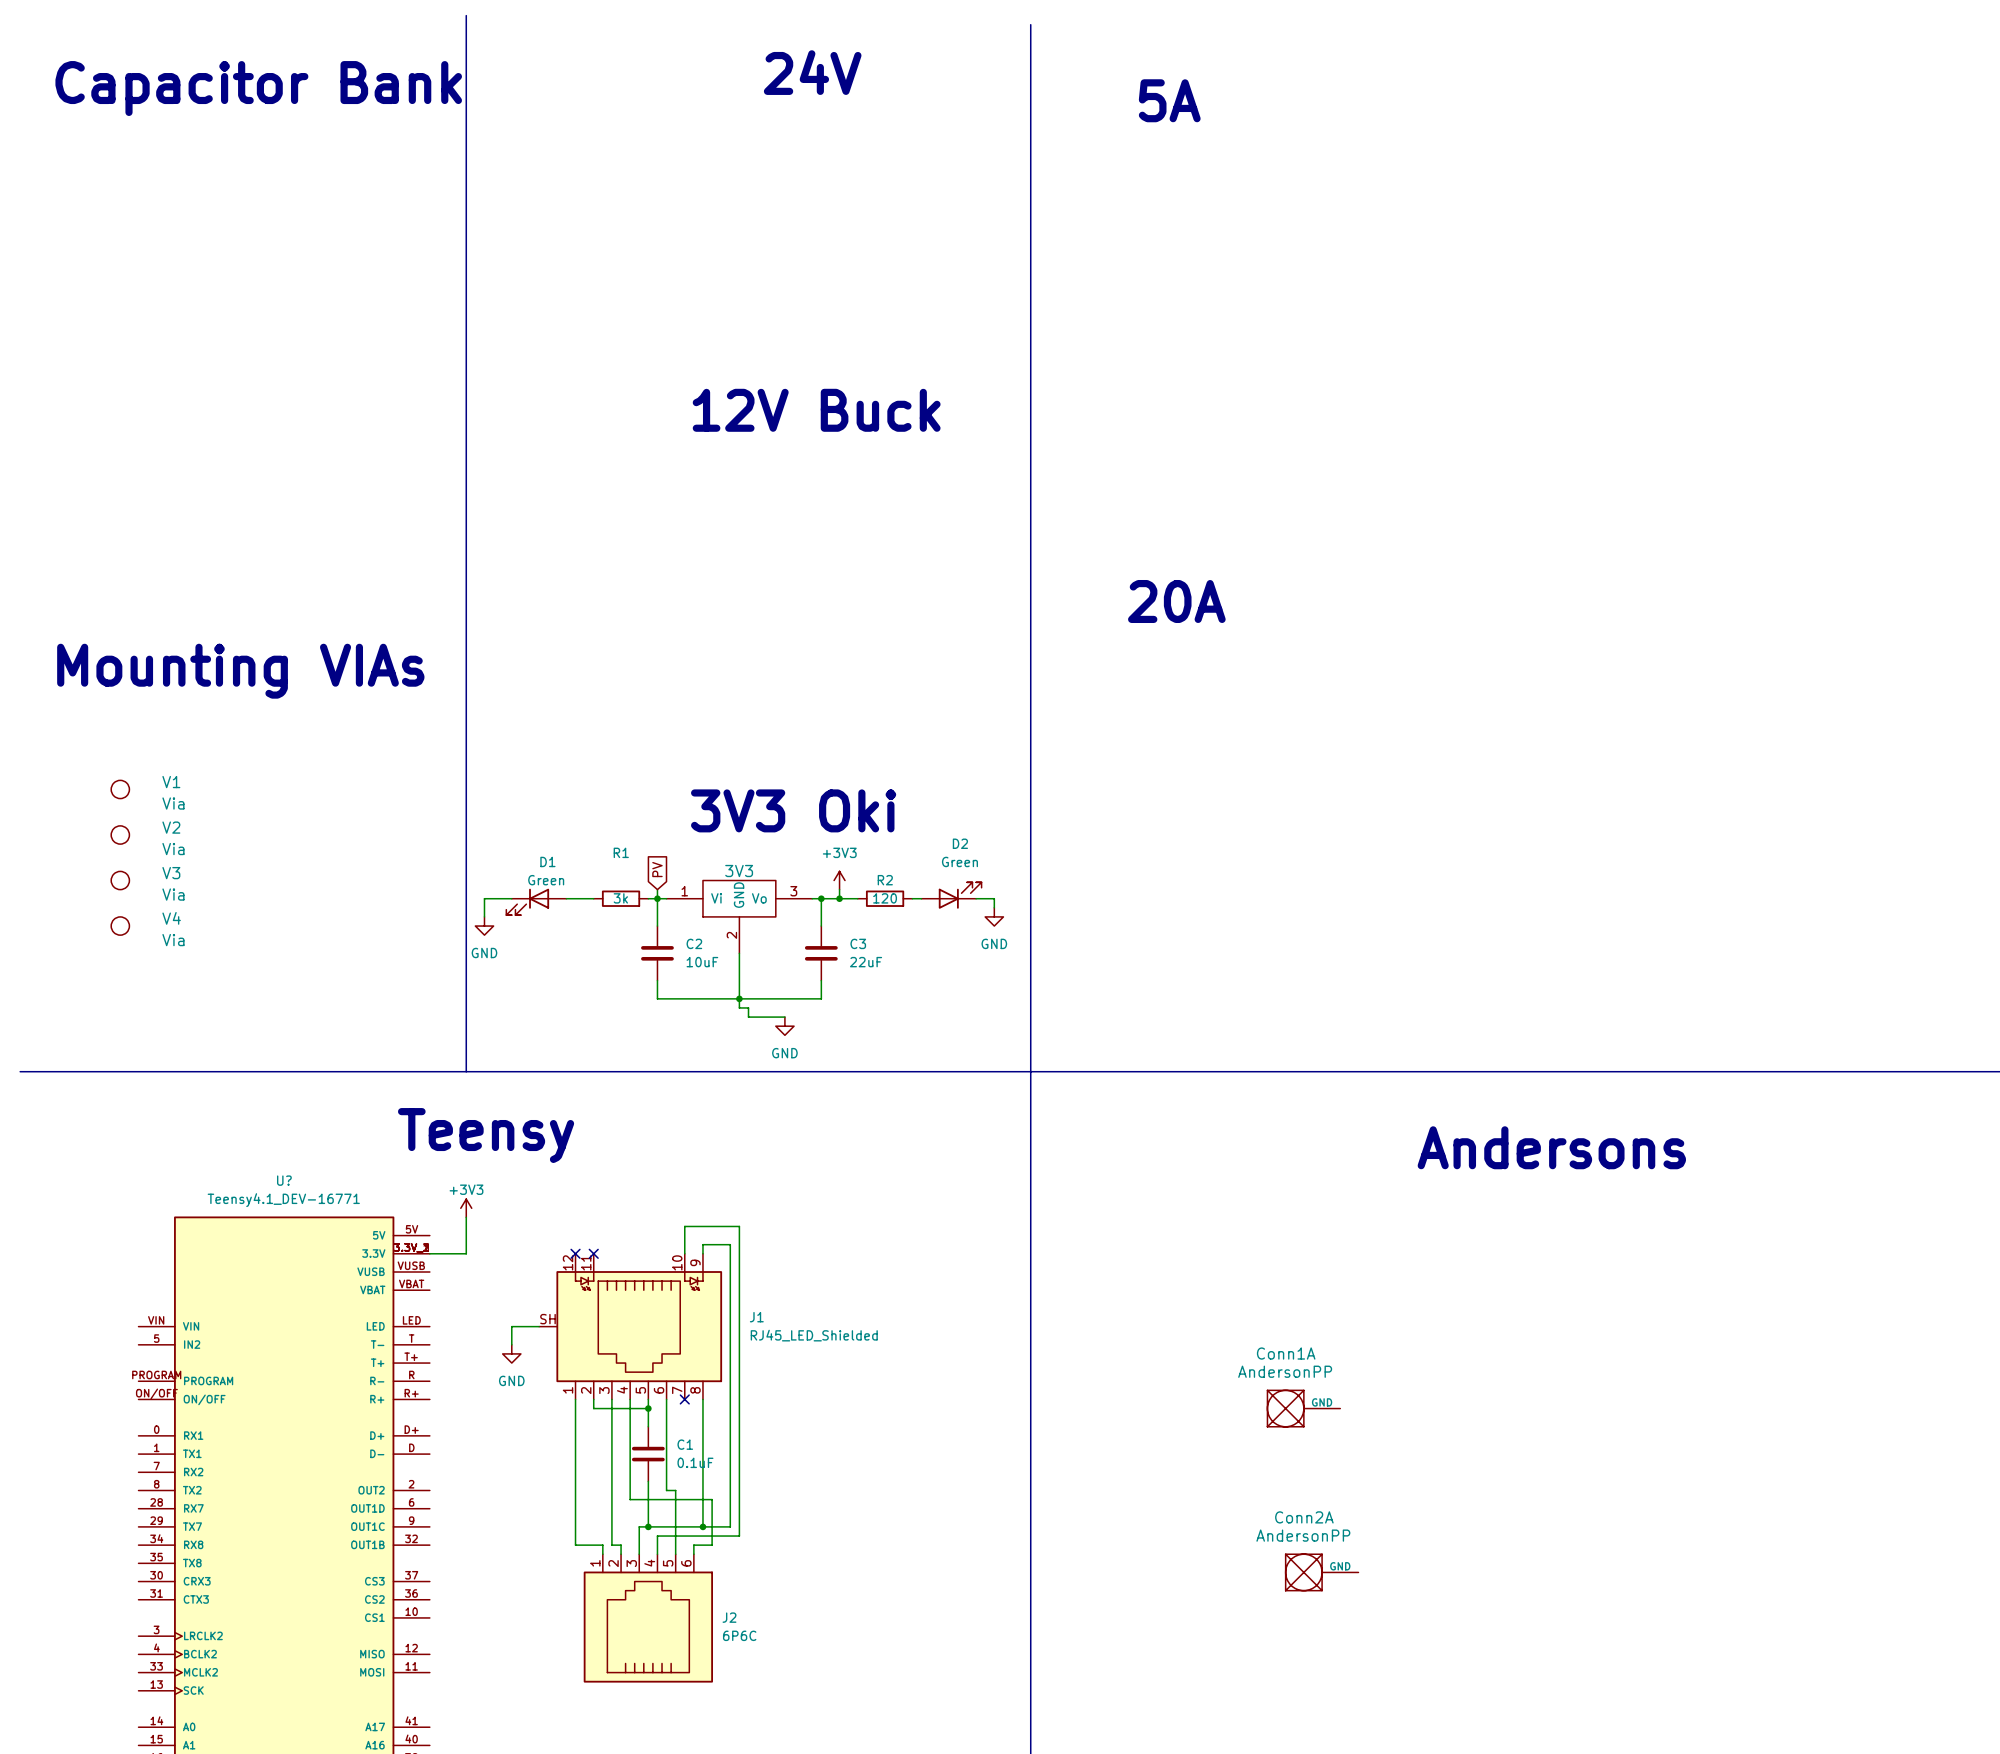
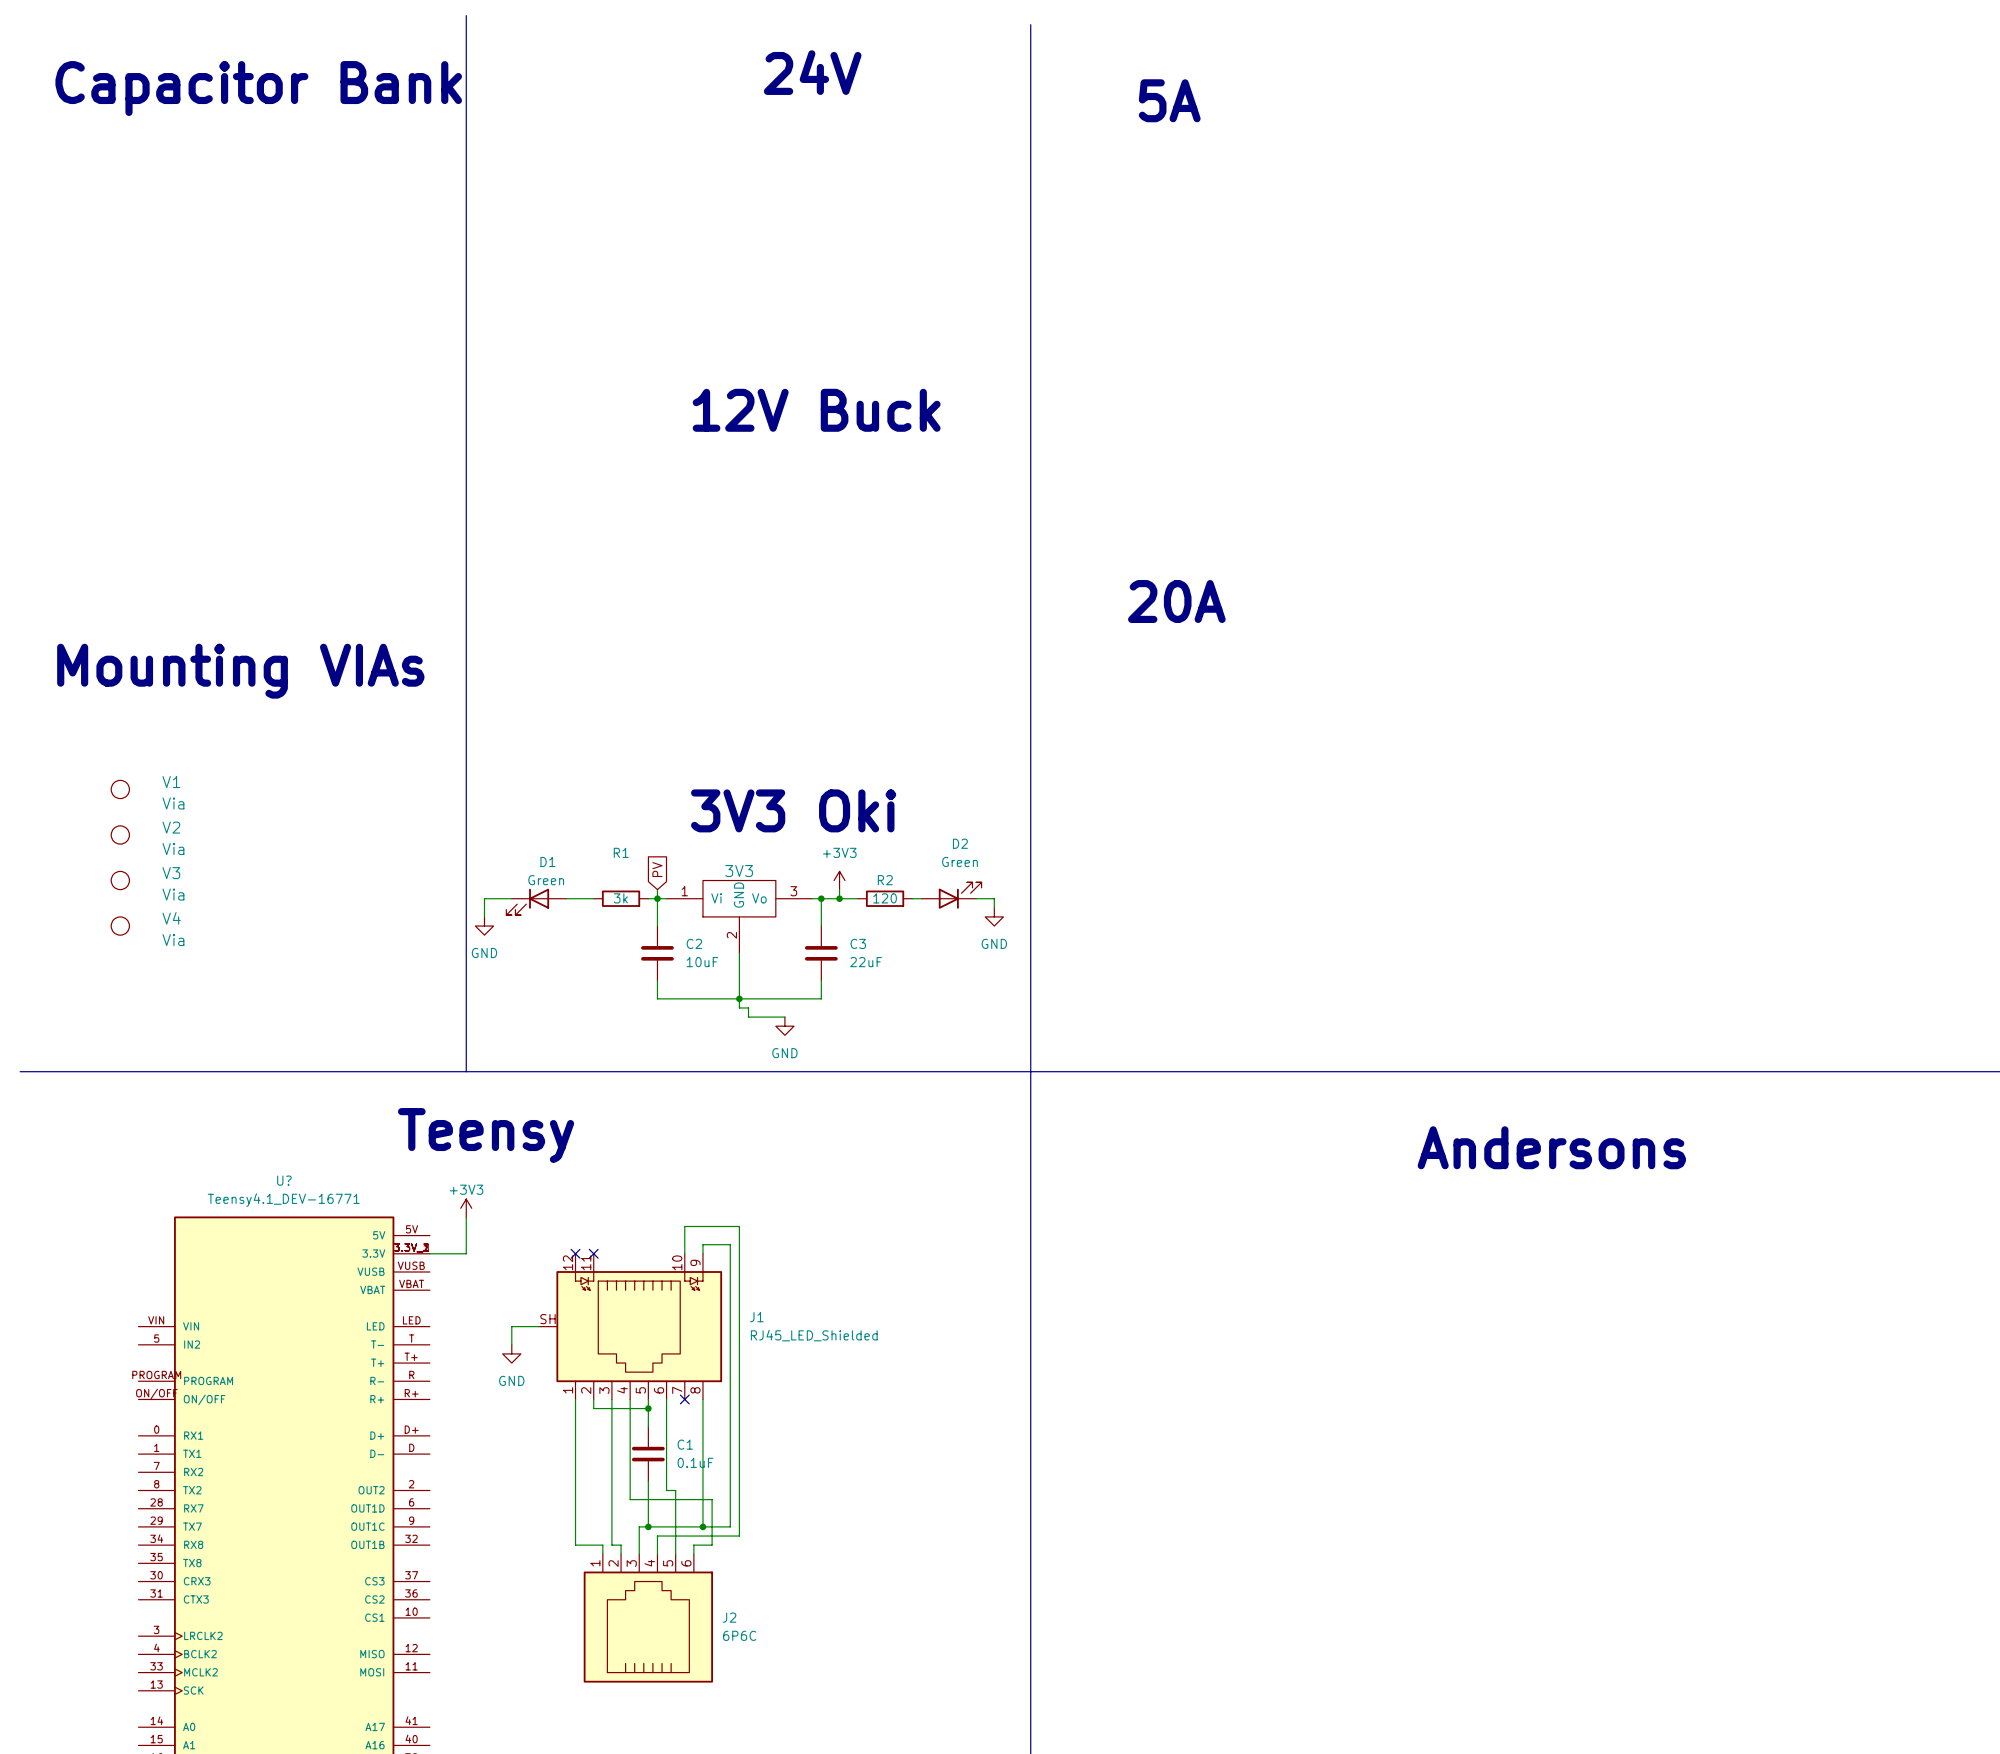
Conn1A: AndersonPP (1303, 1408) -> none
Conn2A: AndersonPP (1322, 1572) -> none

